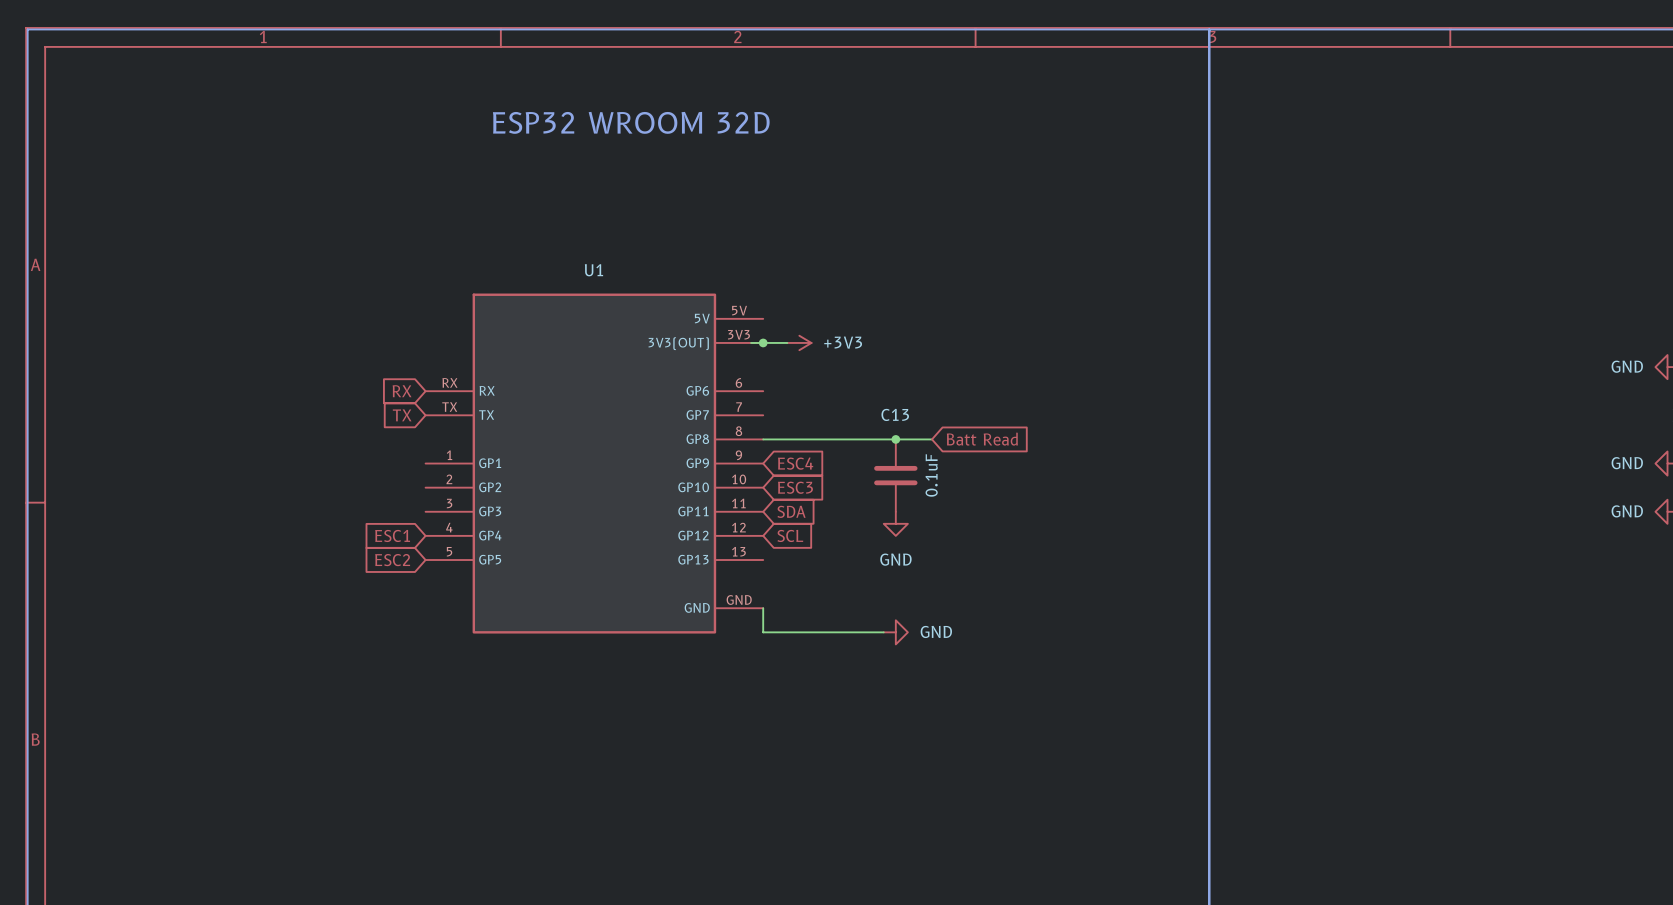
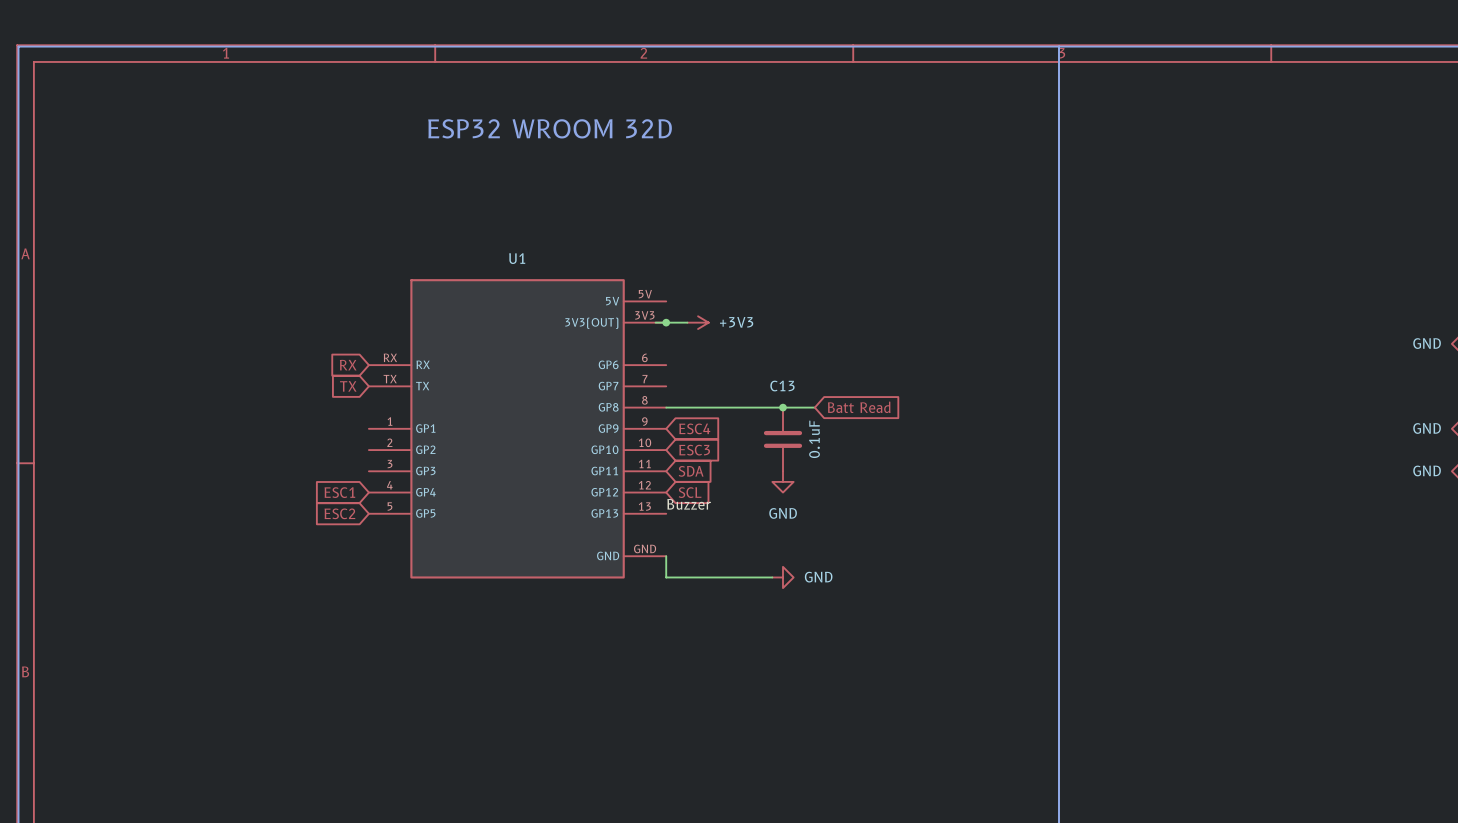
label: none -> Buzzer (689, 504)

